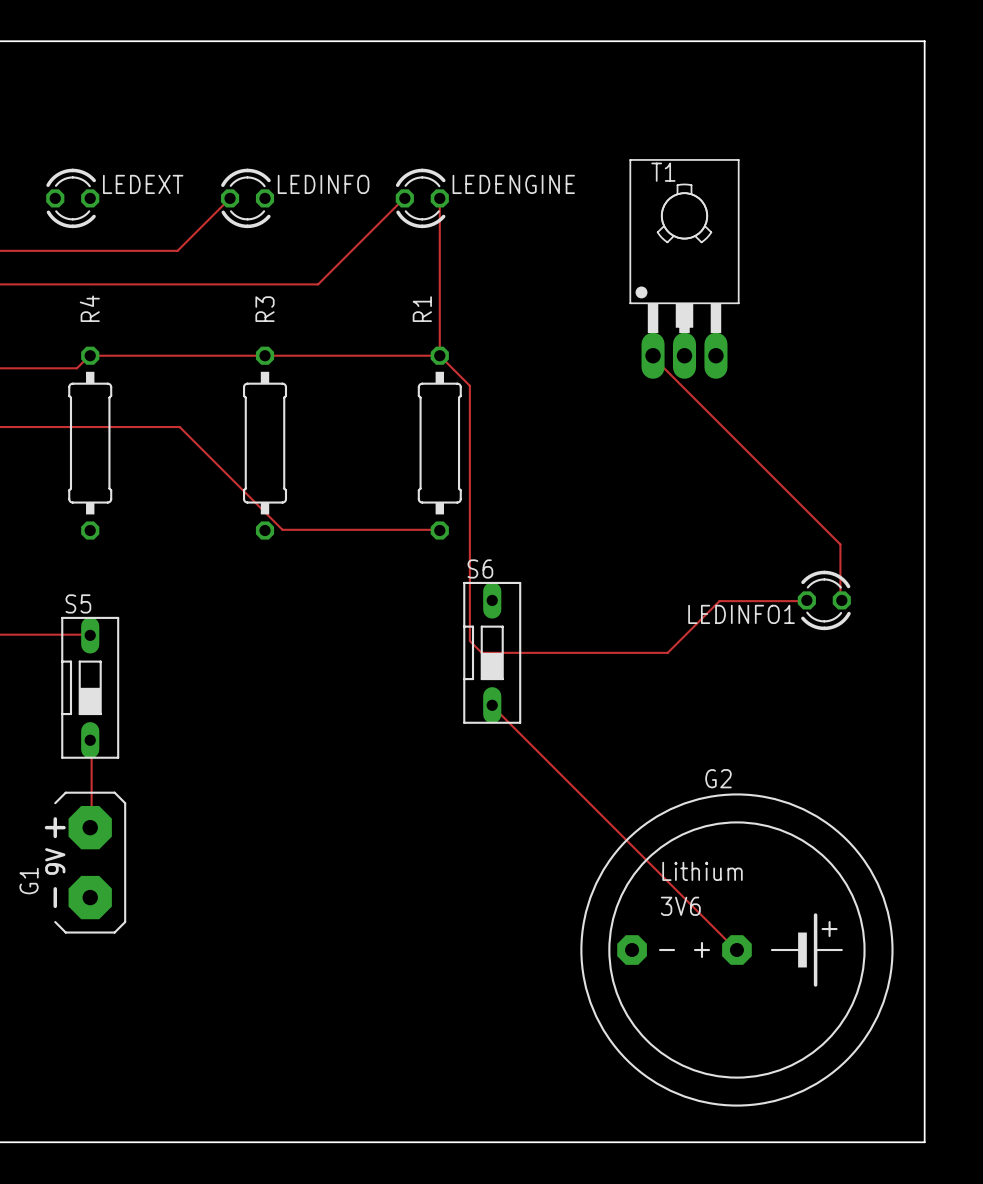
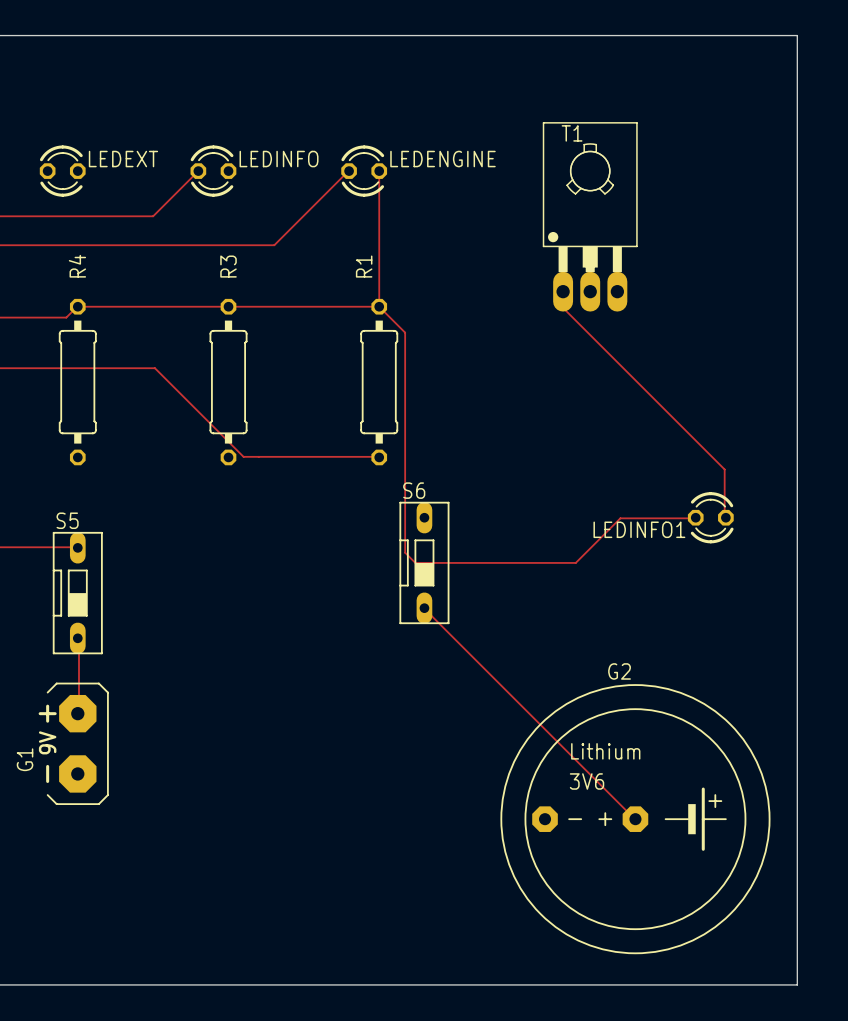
T1 position: (684, 268) -> (590, 216)

